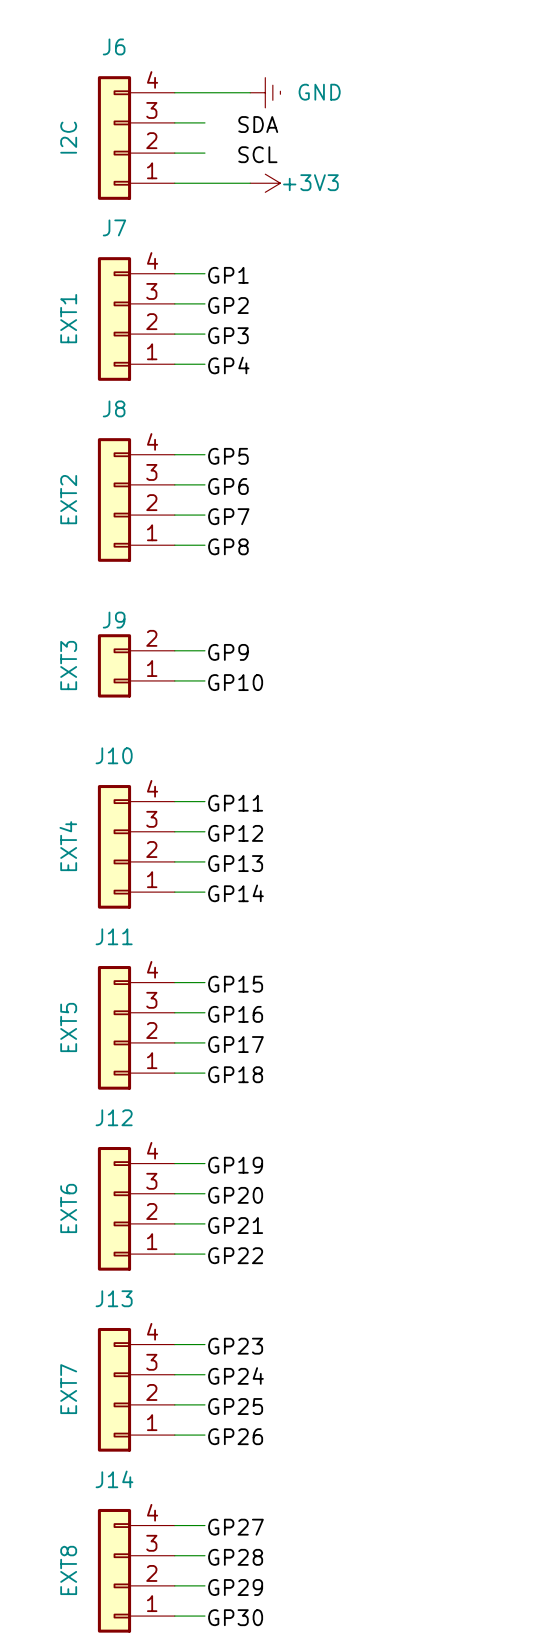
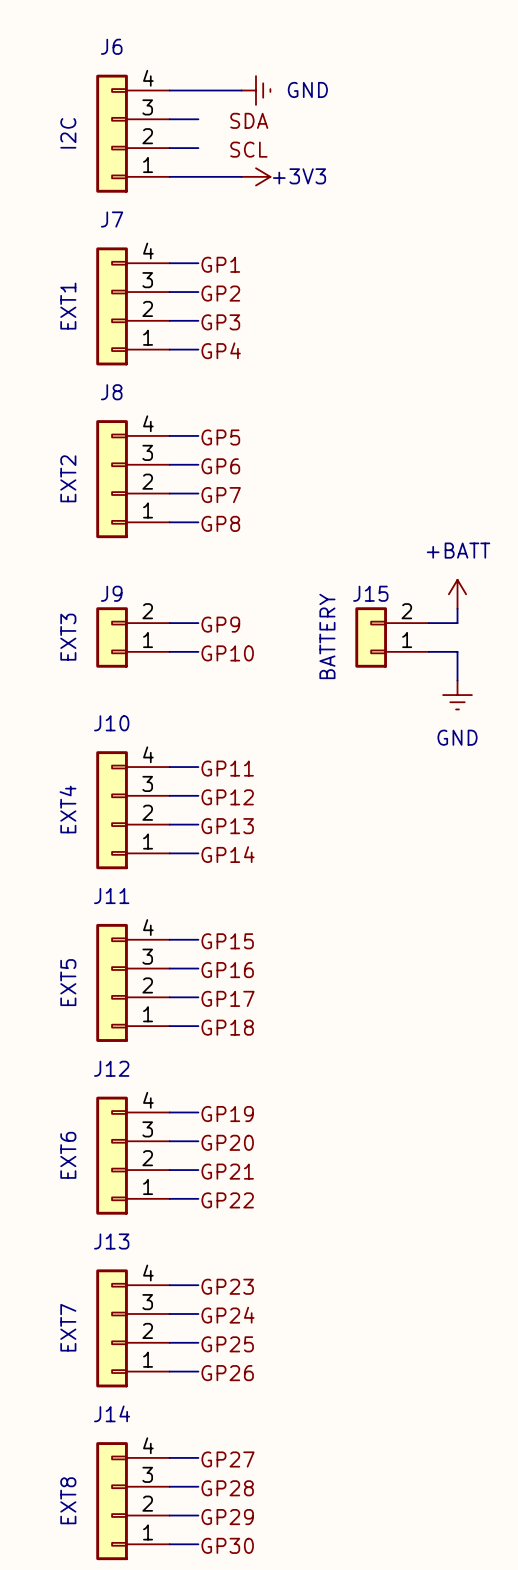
power symbol: none -> +BATT (457, 594)
wire: none -> (457, 608) (457, 623) (428, 623)
J15: none -> BATTERY (392, 637)
wire: none -> (428, 651) (457, 651) (457, 680)
power symbol: none -> GND (457, 695)

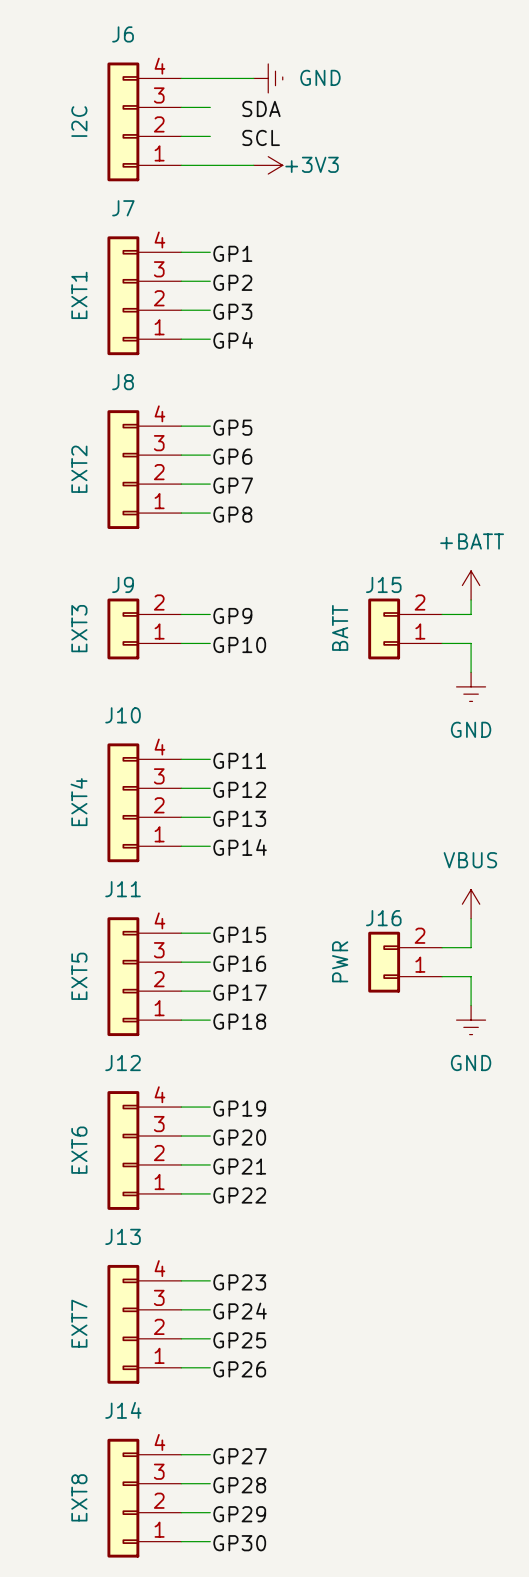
J15 value: BATTERY (327, 636) -> BATT (340, 627)
power symbol: none -> VBUS (471, 904)
wire: none -> (471, 918) (471, 947) (442, 947)
J16: none -> PWR (405, 962)
wire: none -> (442, 976) (471, 976) (471, 1005)
power symbol: none -> GND (471, 1020)

